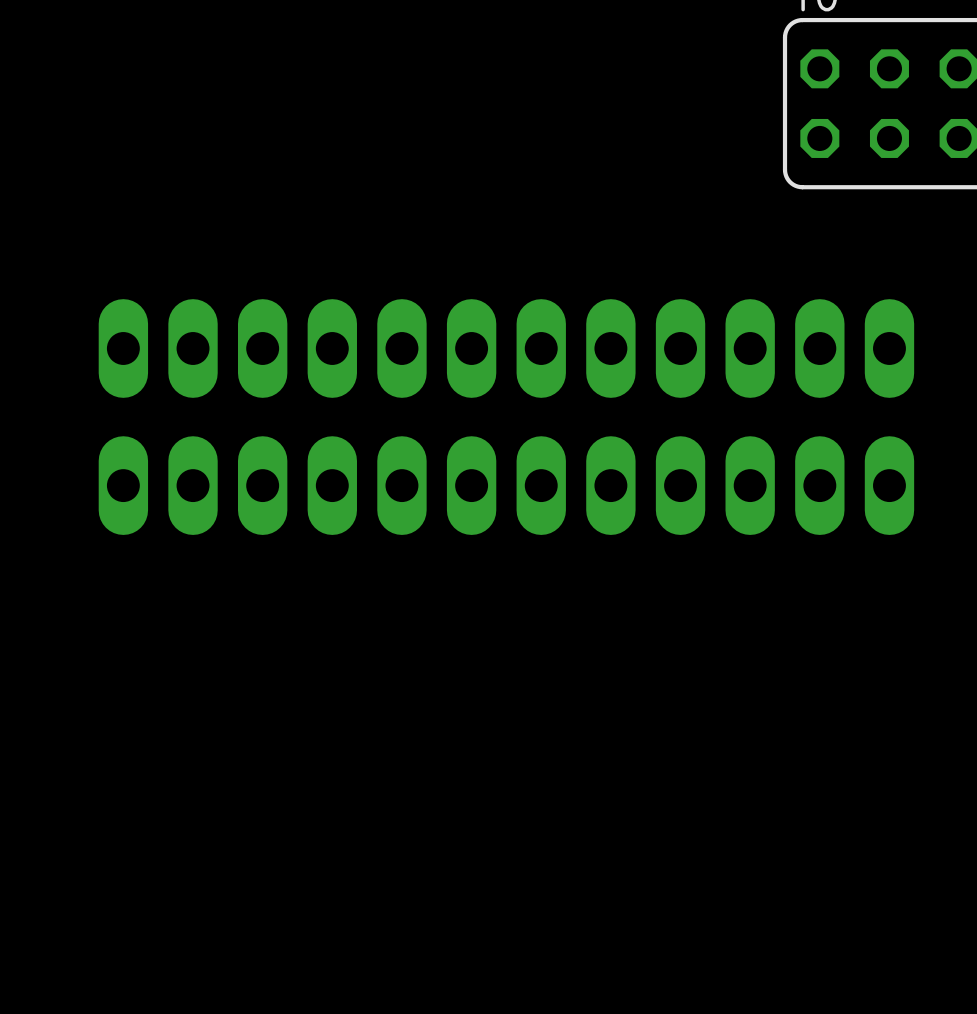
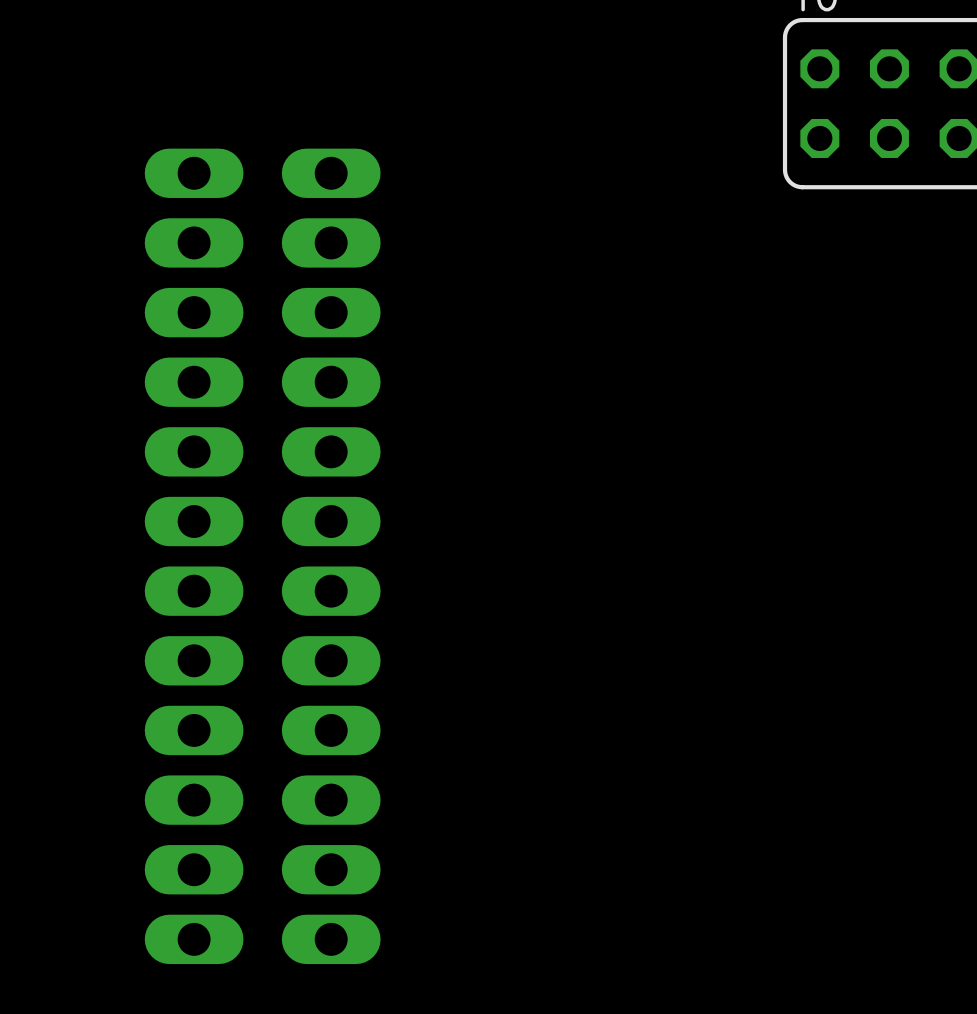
part rotation: 0° (506, 417) -> 90° clockwise (262, 556)

